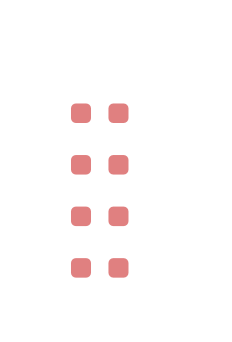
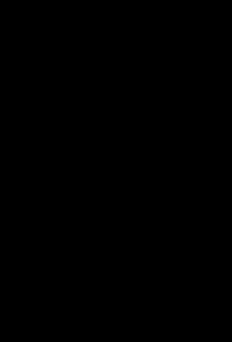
part: (99, 113) -> none
part: (99, 164) -> none
part: (99, 216) -> none
part: (99, 267) -> none

